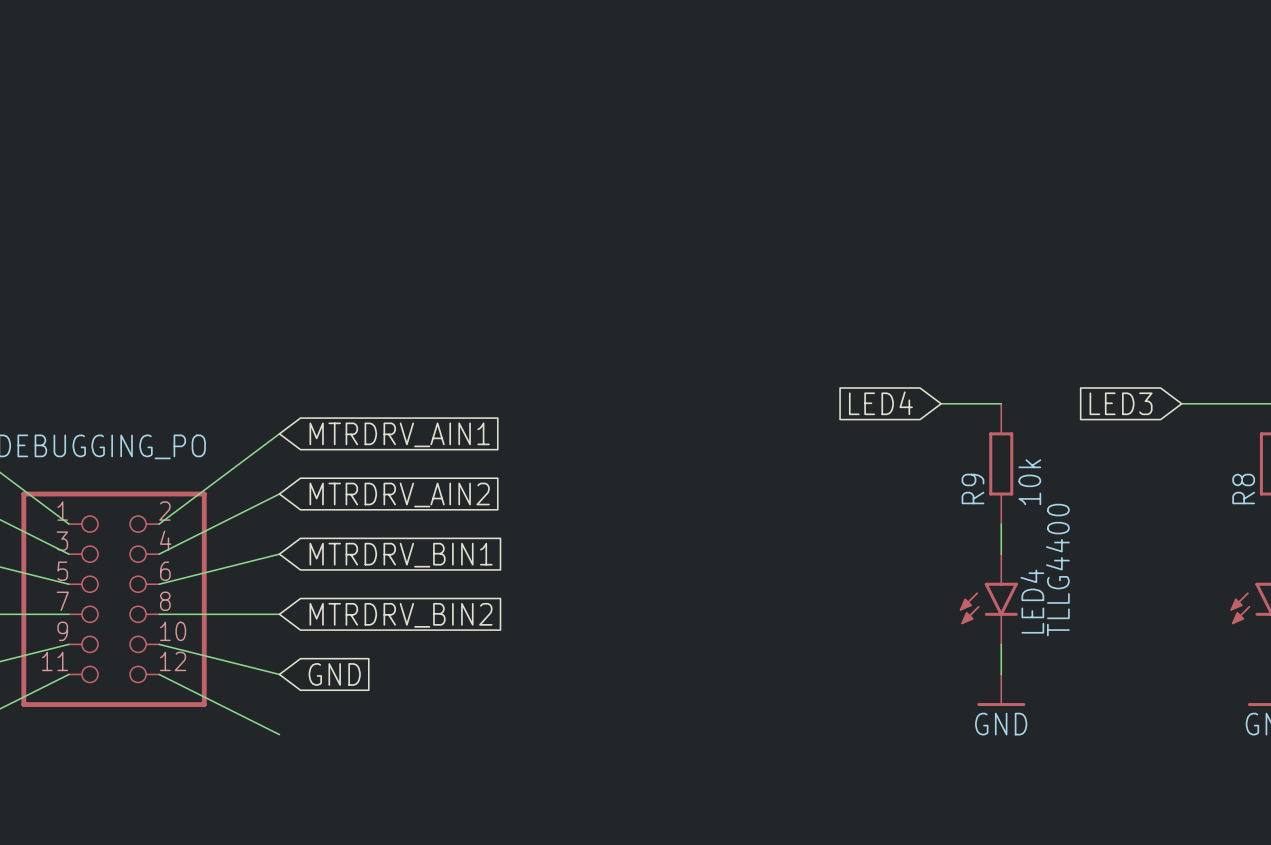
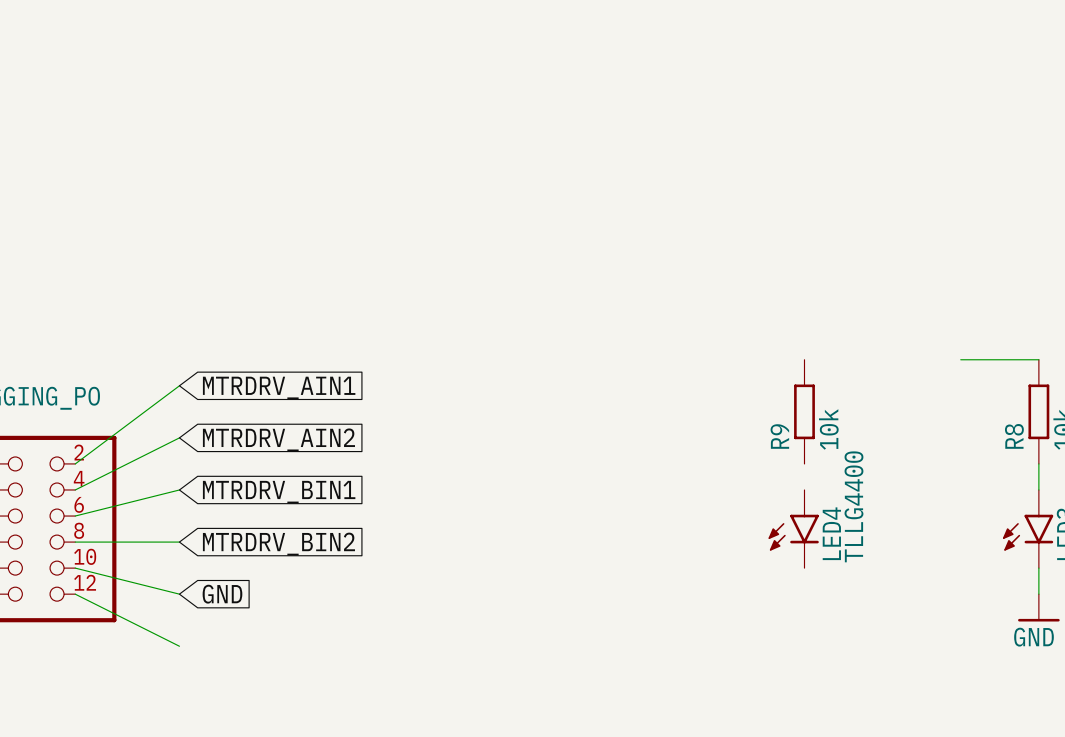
global label: LED4 (880, 403) -> none
wire: (941, 403) (1001, 403) -> none
global label: LED3 (1121, 403) -> none
wire: (1001, 524) (1001, 554) -> none
wire: (1001, 644) (1001, 674) -> none
power symbol: GND (1001, 690) -> none

